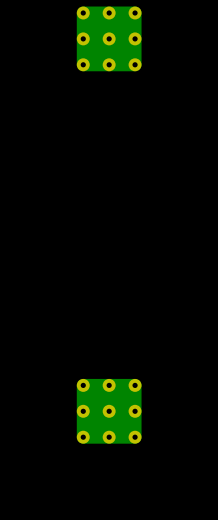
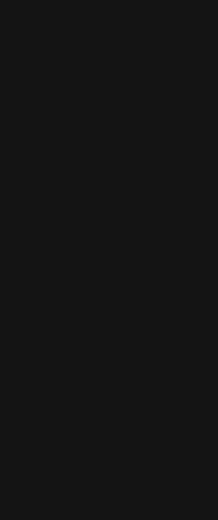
part: (109, 38) -> none
part: (109, 411) -> none

